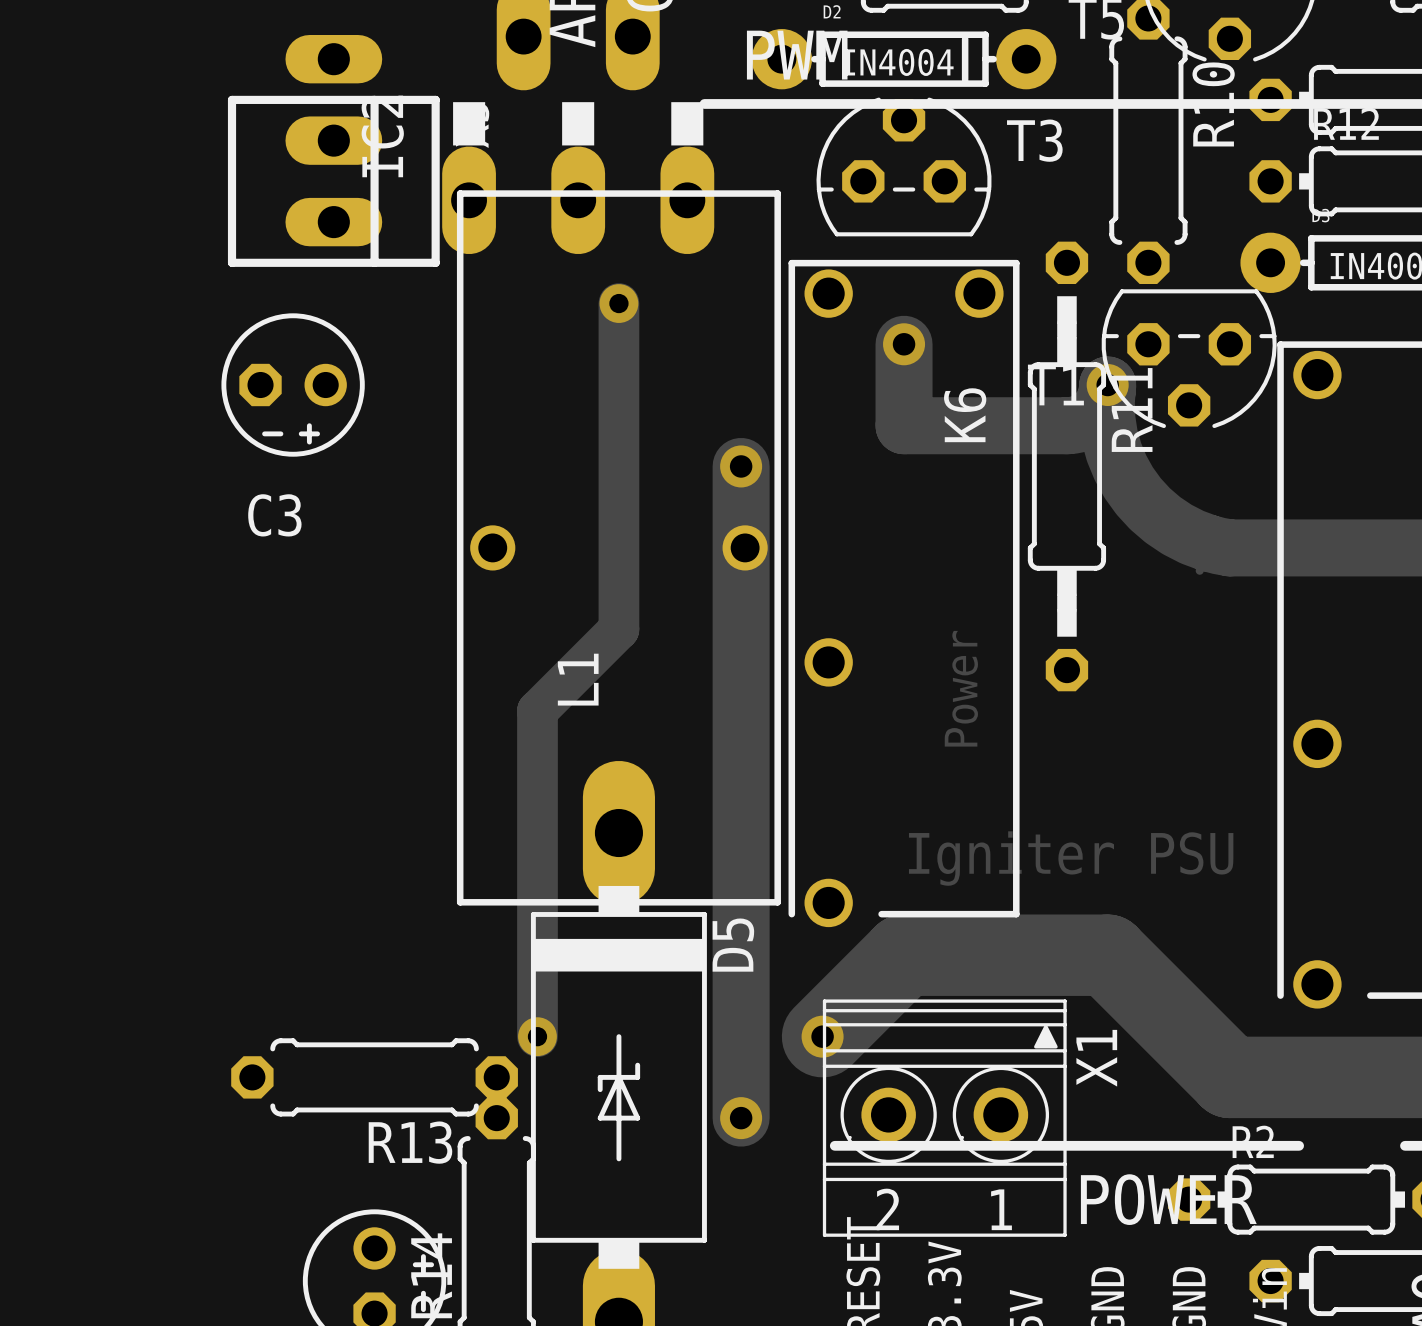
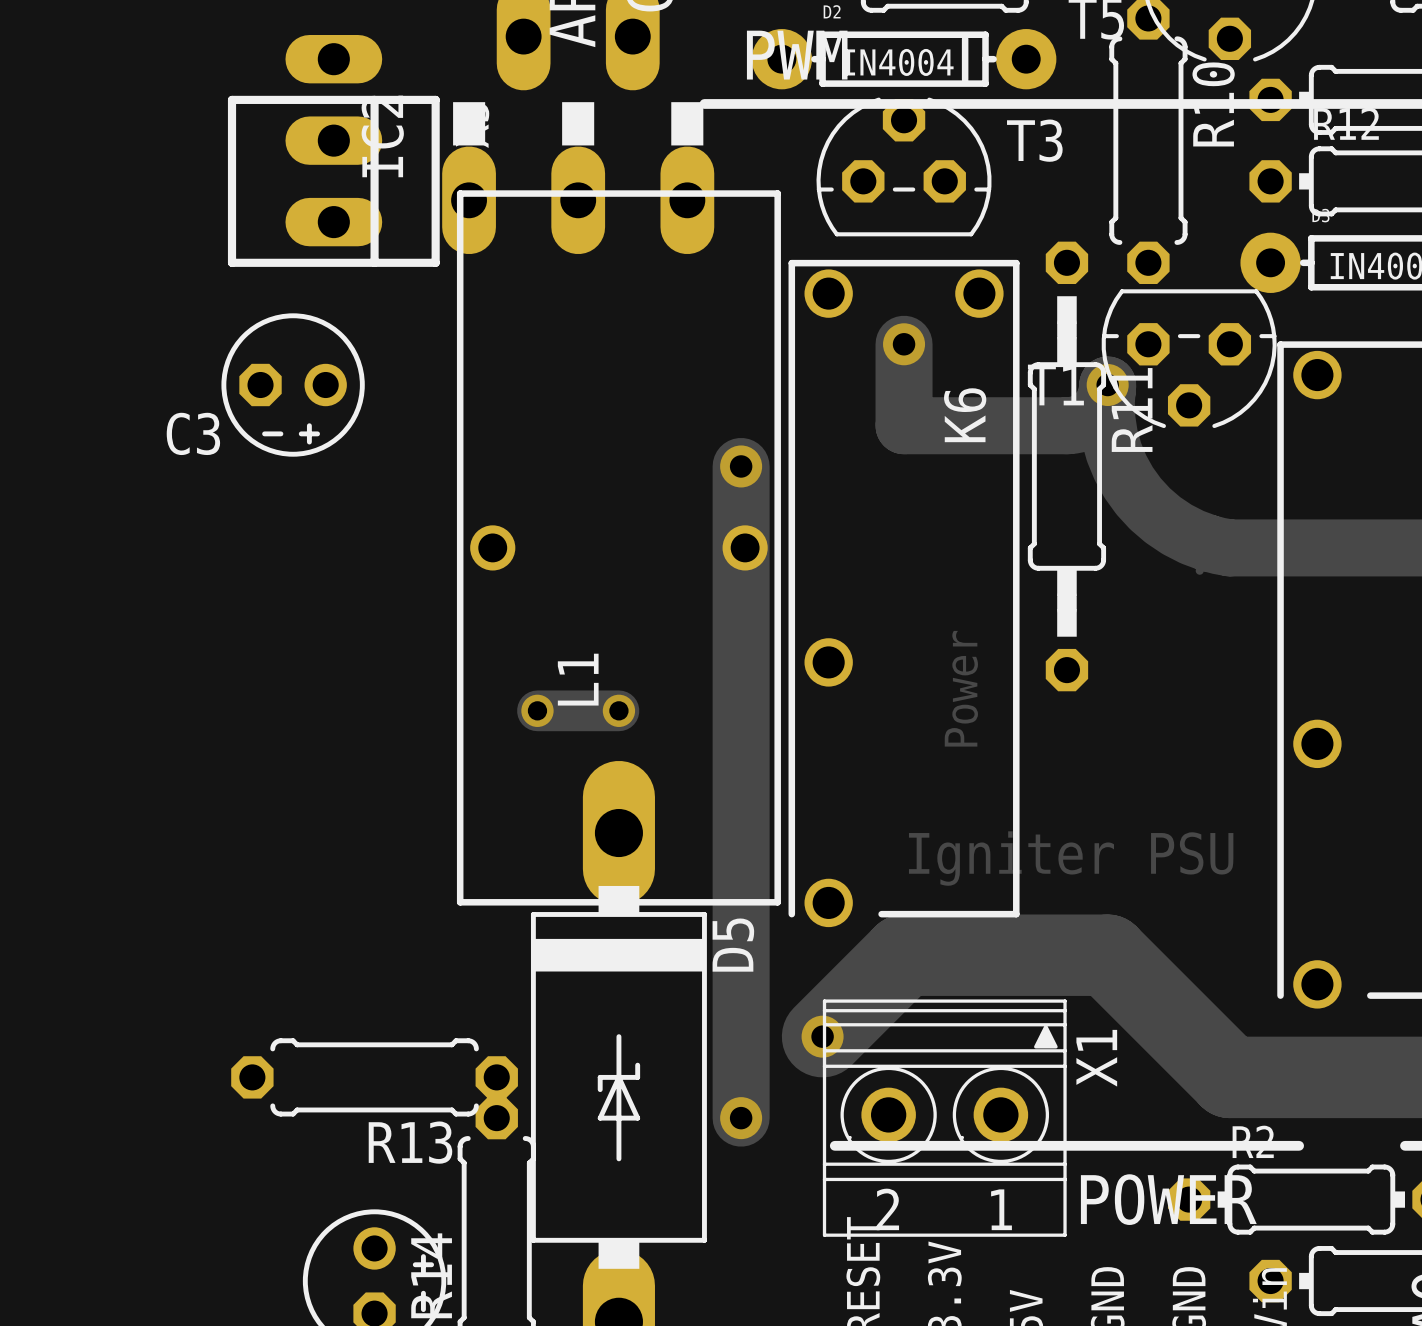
track: (618, 303) (618, 629) (537, 710) (537, 1036) -> none
via: (618, 303) -> none
C3 name position: C3 (274, 515) -> C3 (193, 433)
track: none -> (537, 710) (618, 710)
via: none -> (537, 710)
via: none -> (618, 710)
via: (537, 1036) -> none

